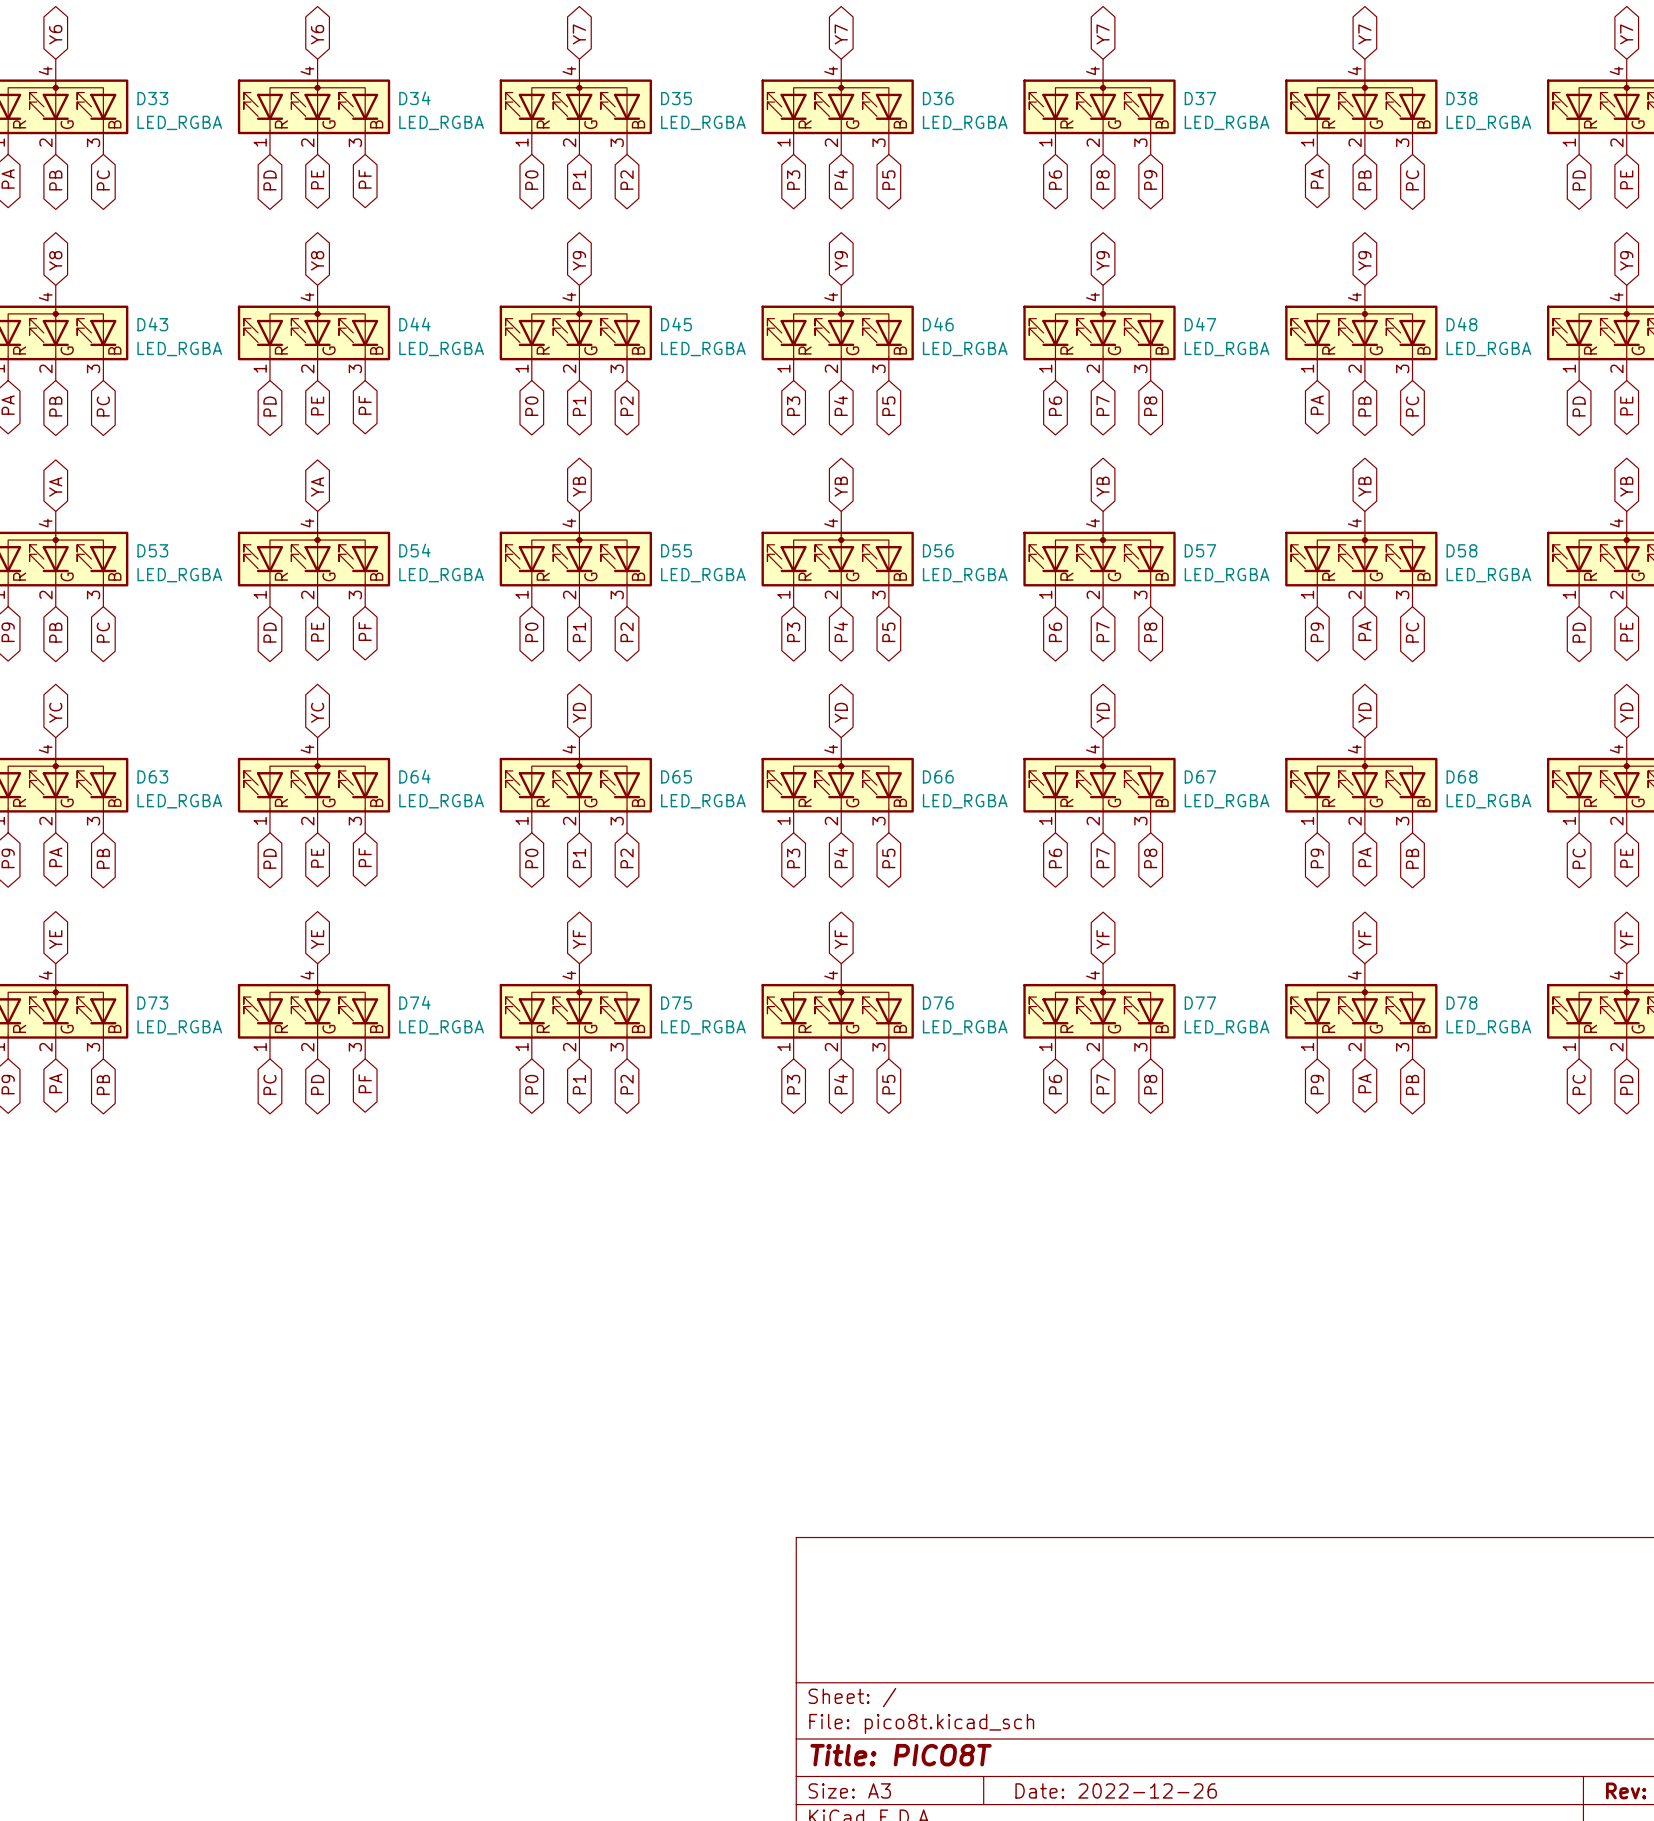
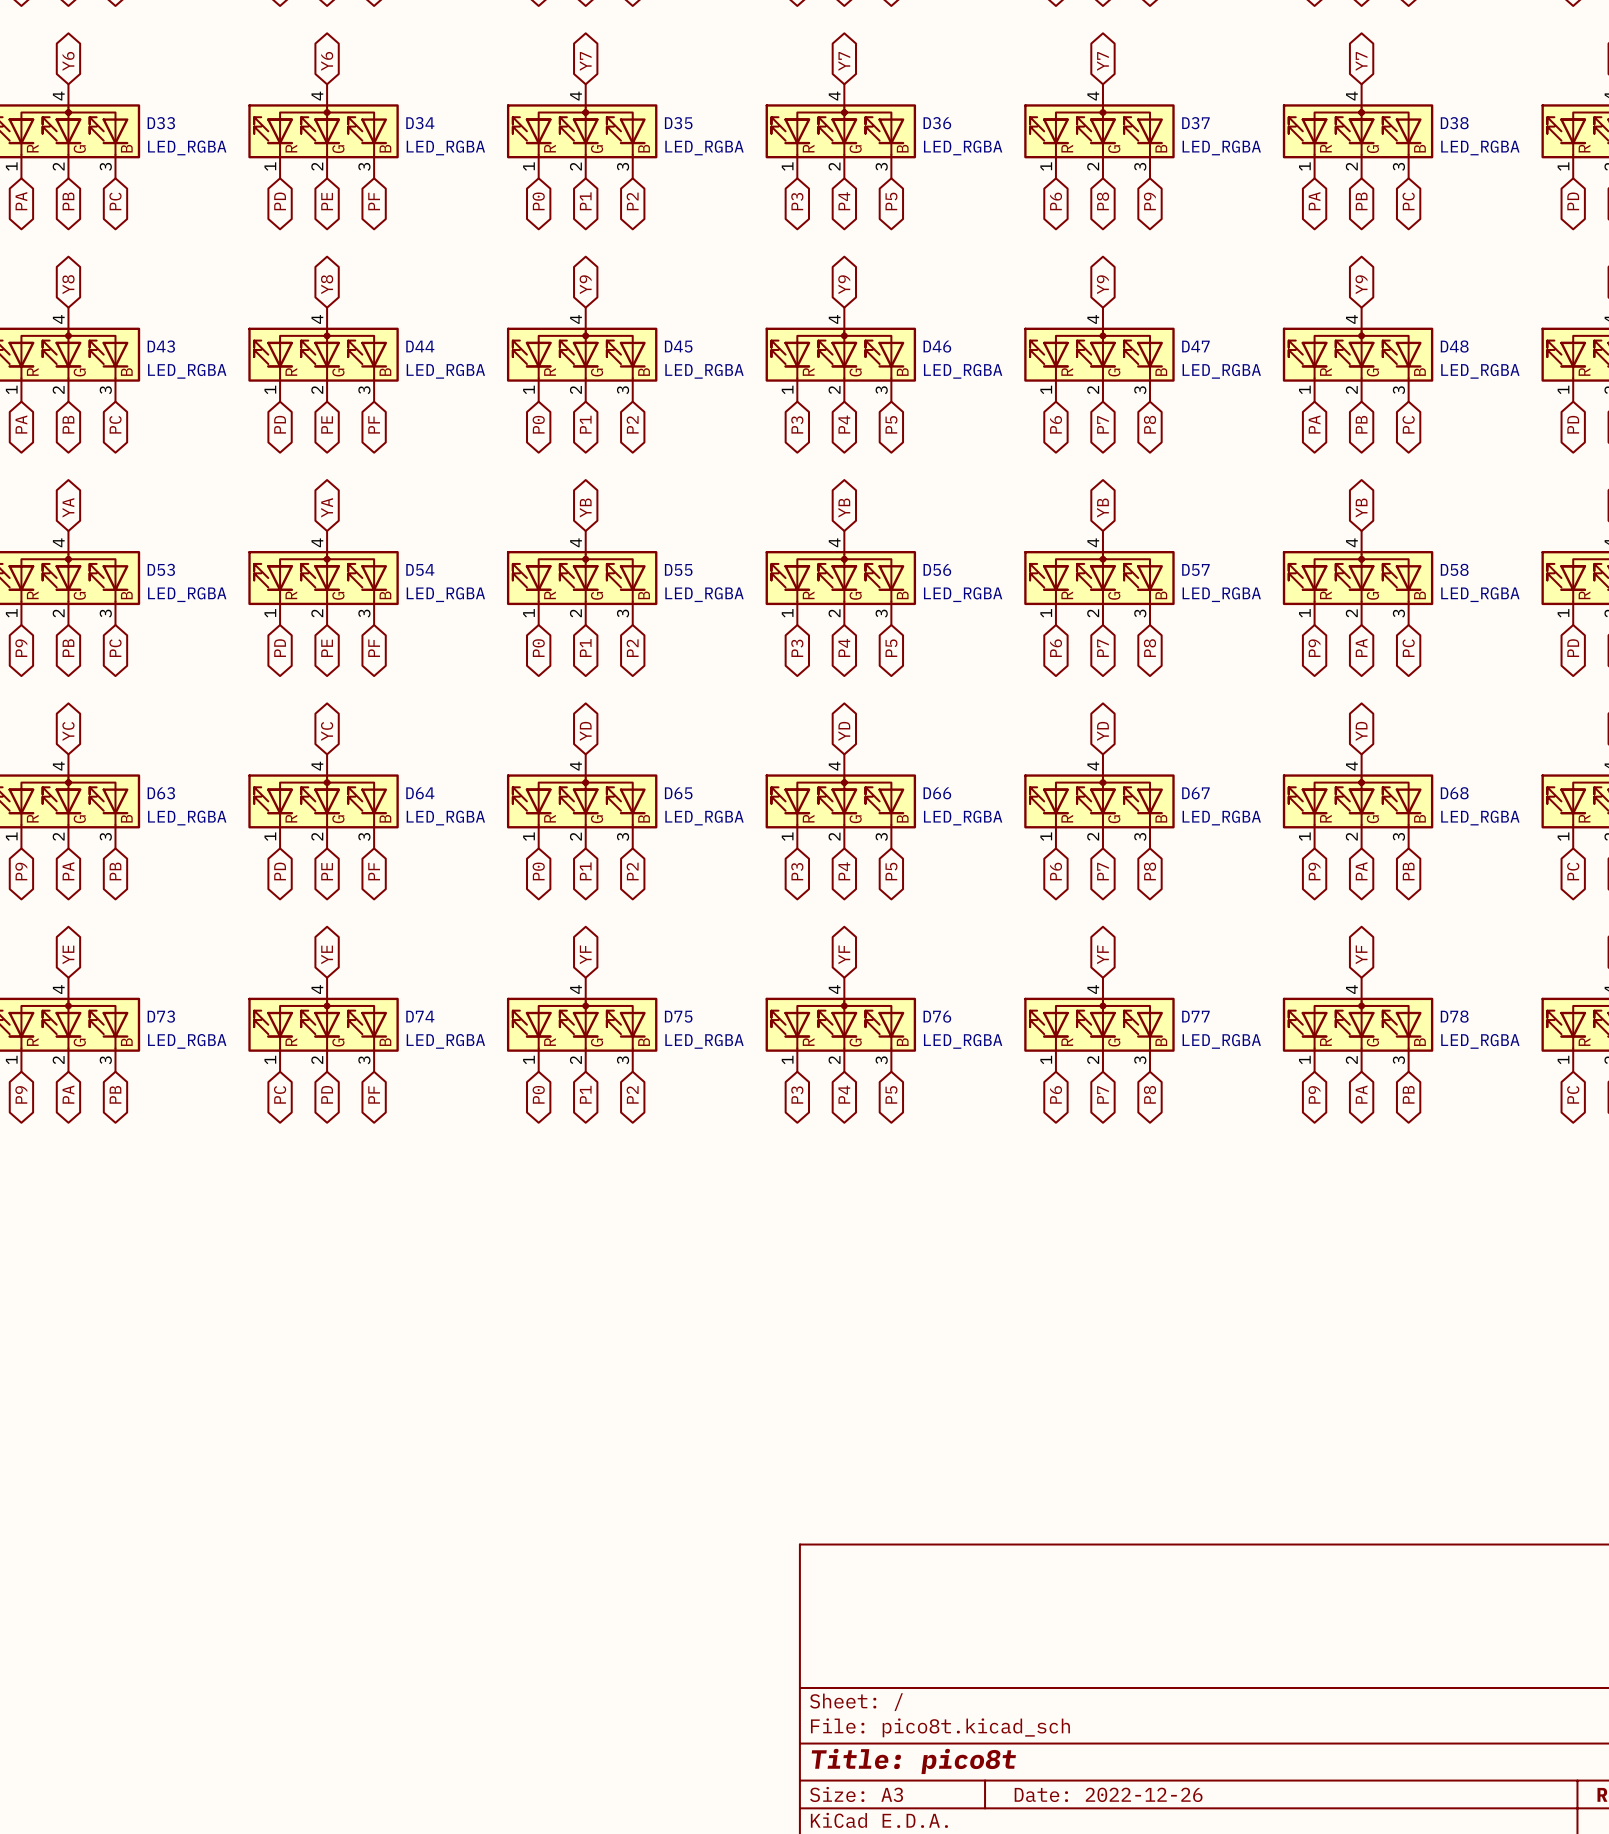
title block: Title: PICO8T (901, 1755) -> Title: pico8t (913, 1761)

